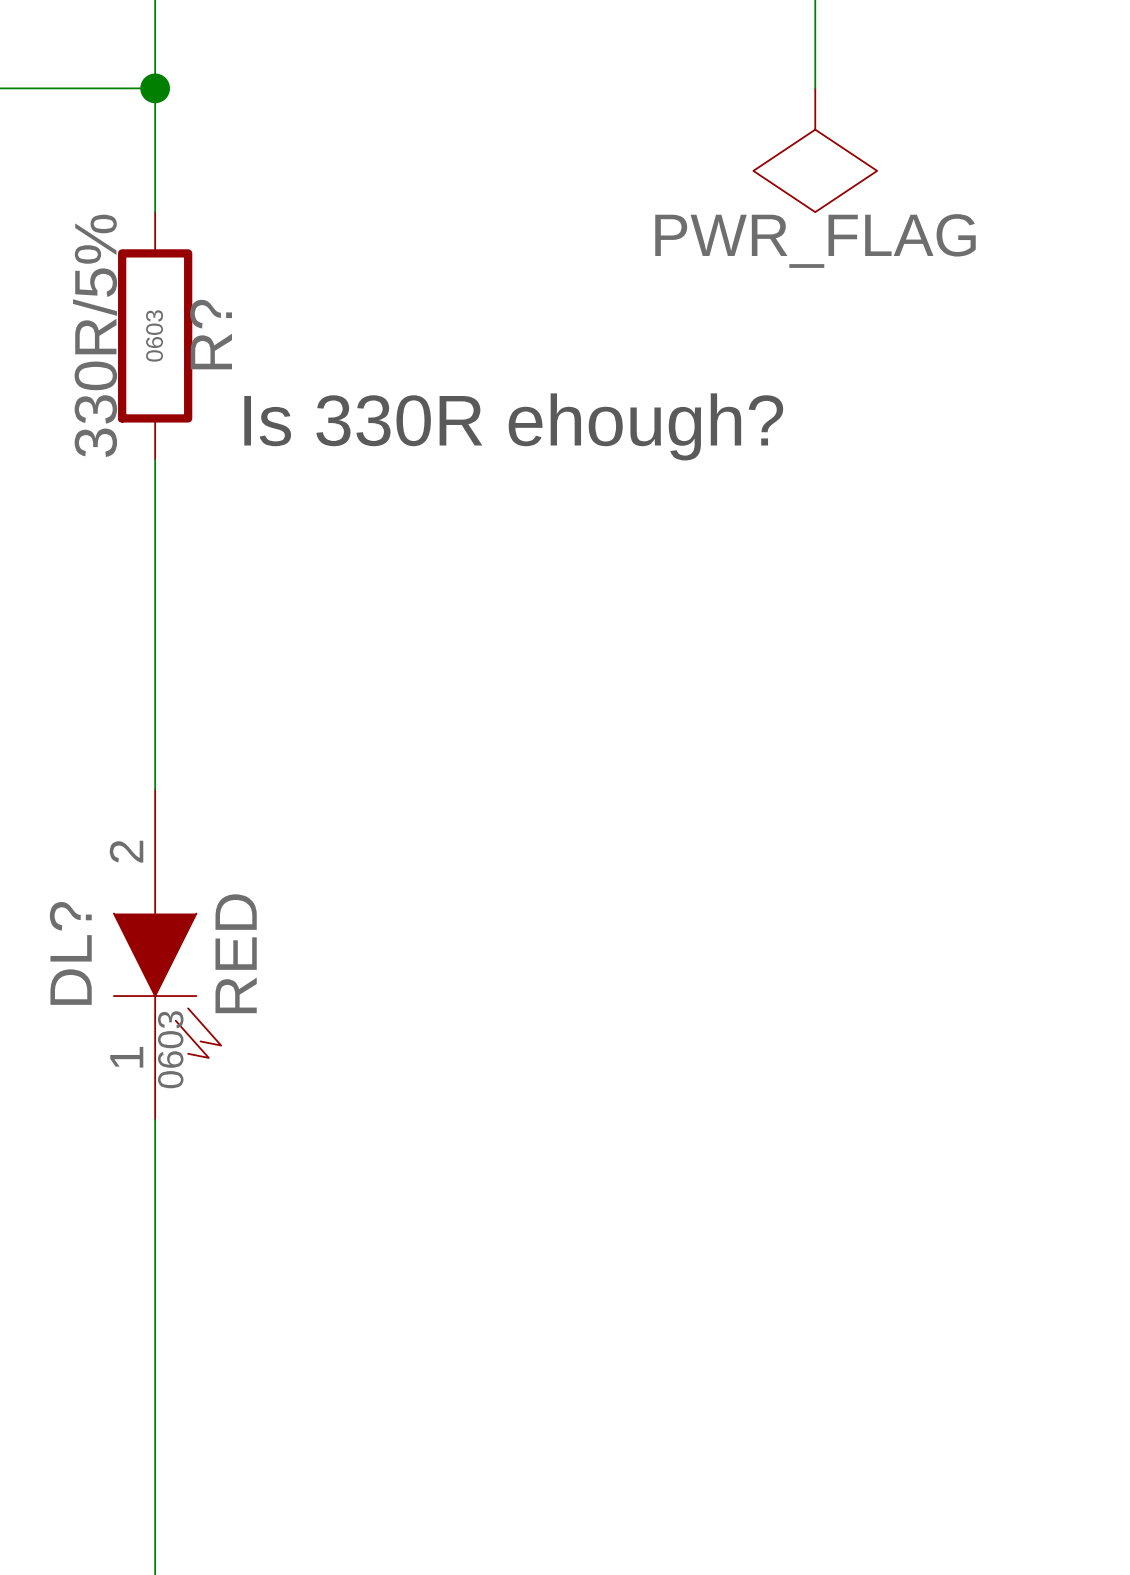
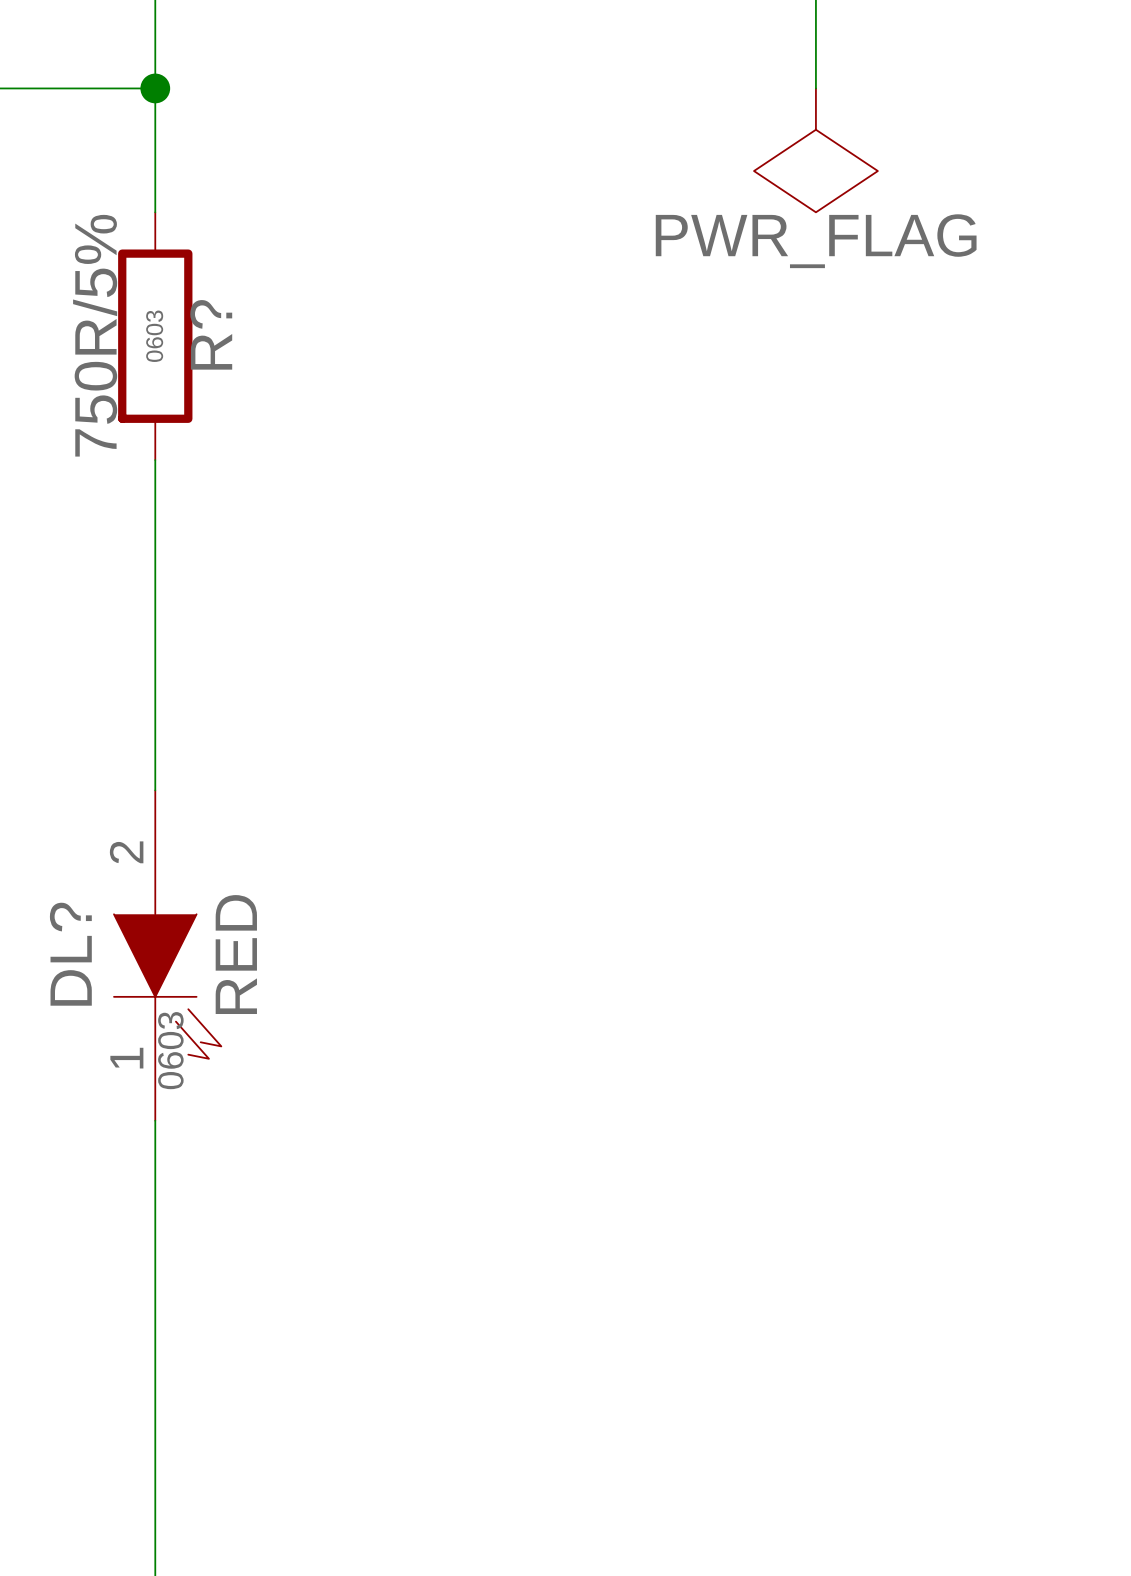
R? value: 330R/5% (95, 335) -> 750R/5% (95, 335)
text: Is 330R ehough? (513, 426) -> none

